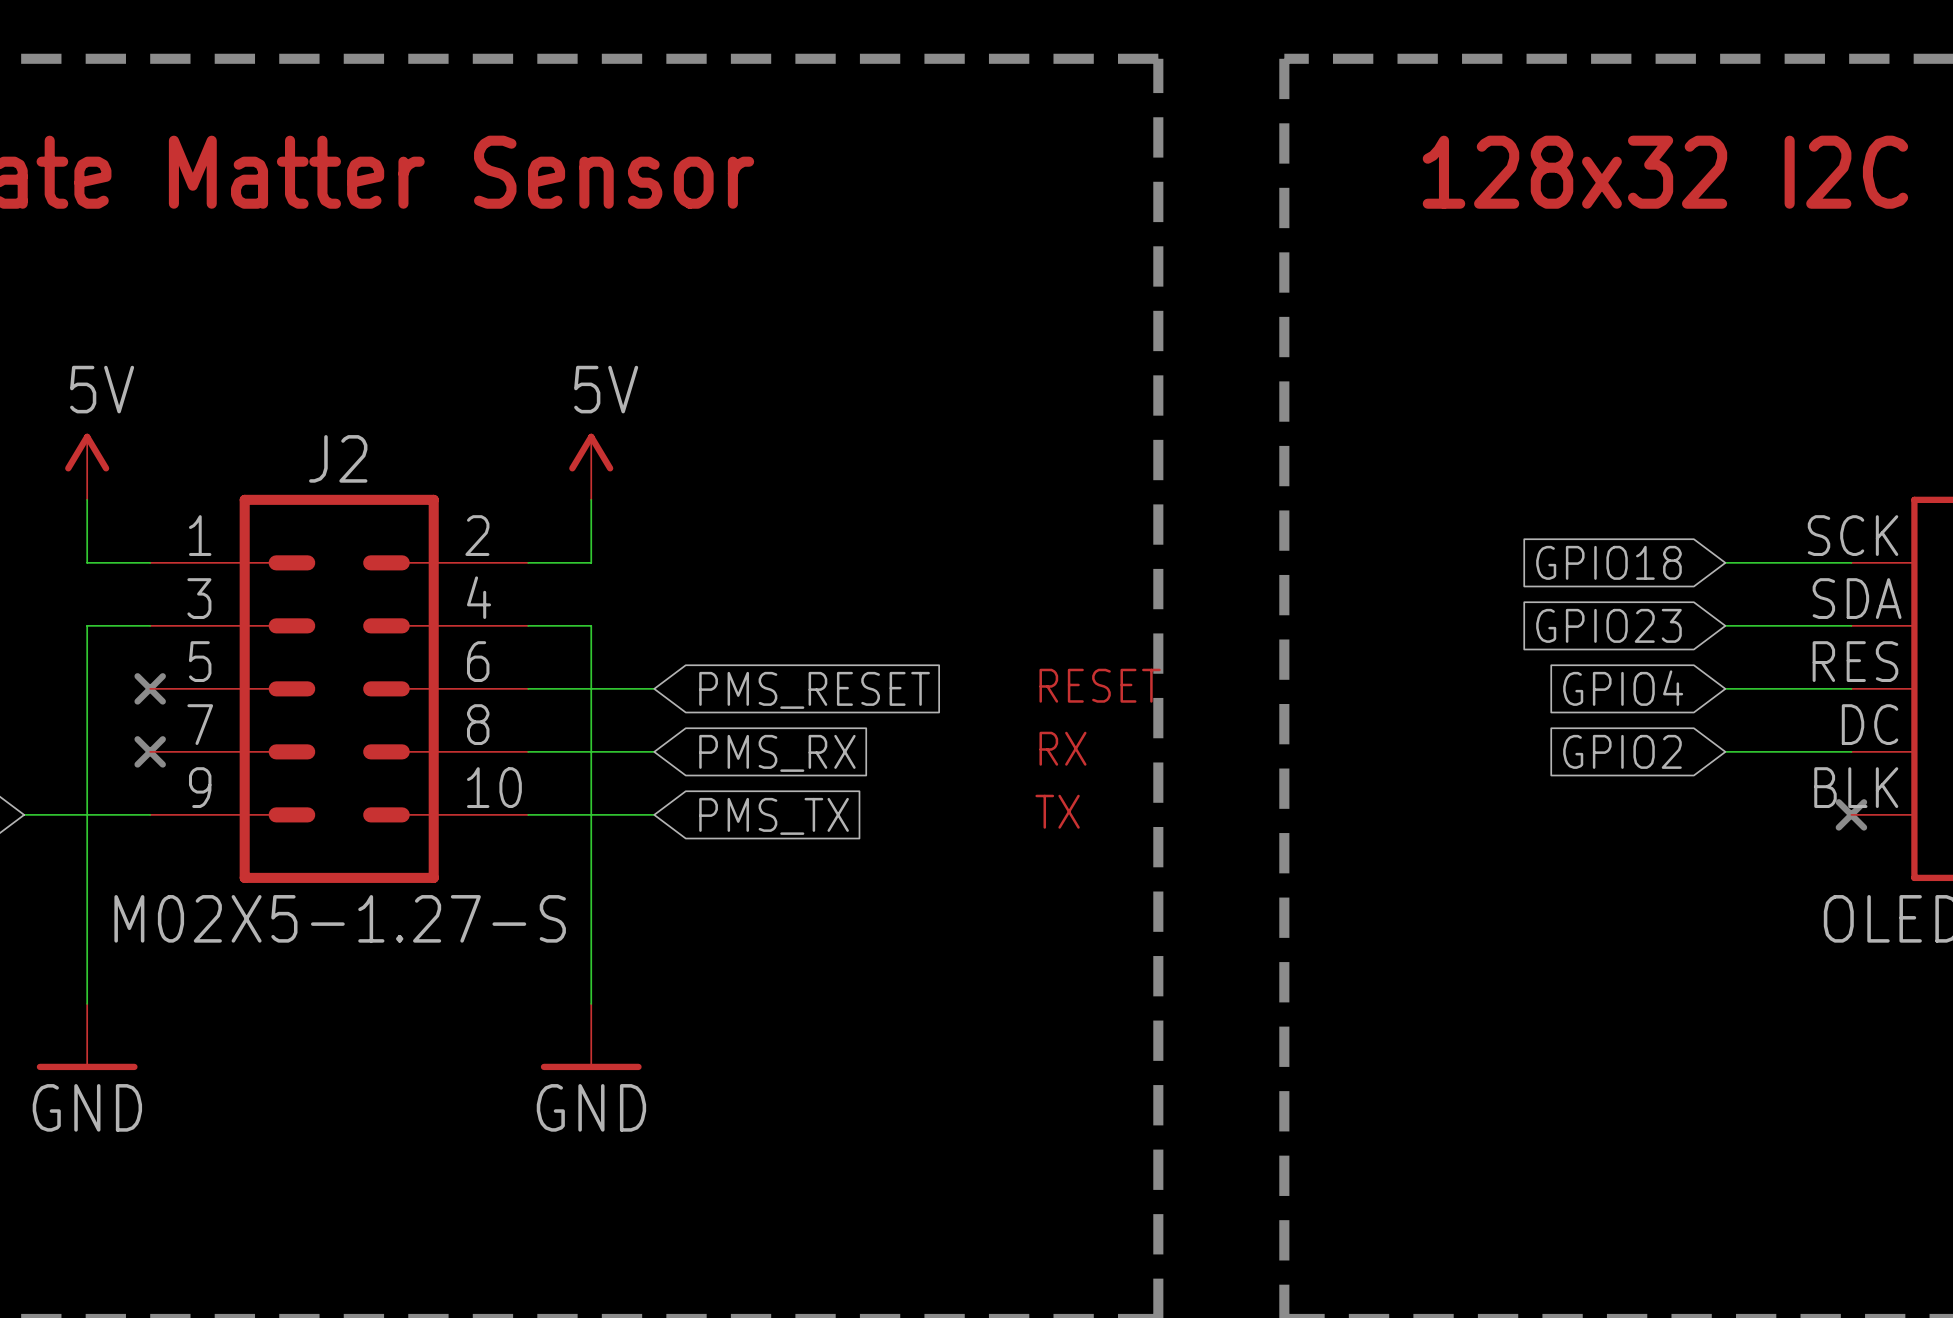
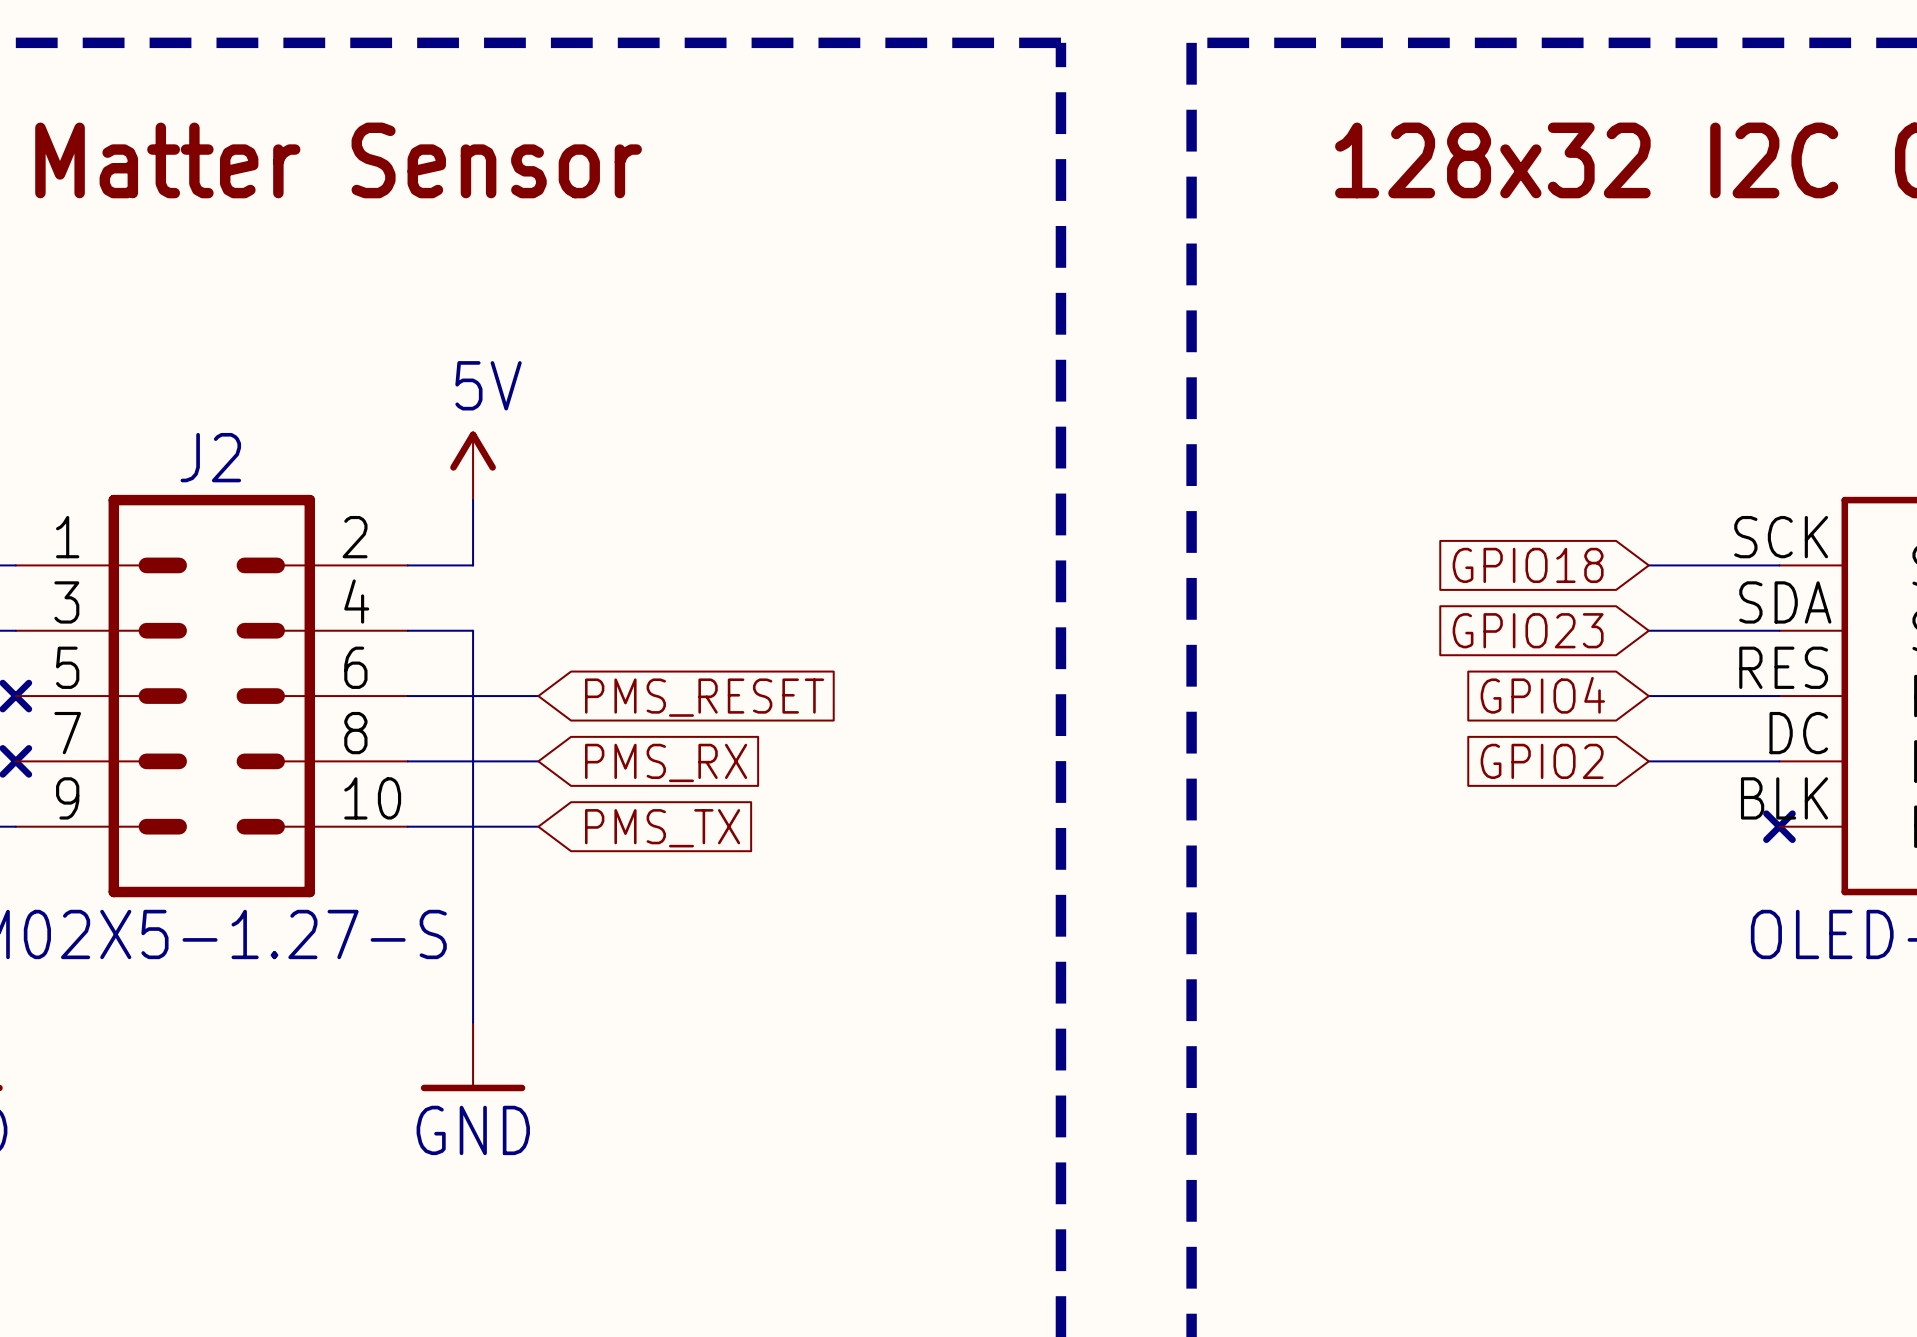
text: RESET (1100, 685) -> none
text: RX (1062, 748) -> none
text: TX (1057, 811) -> none

